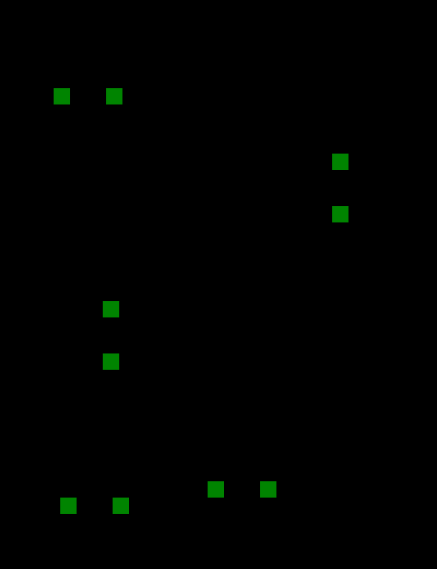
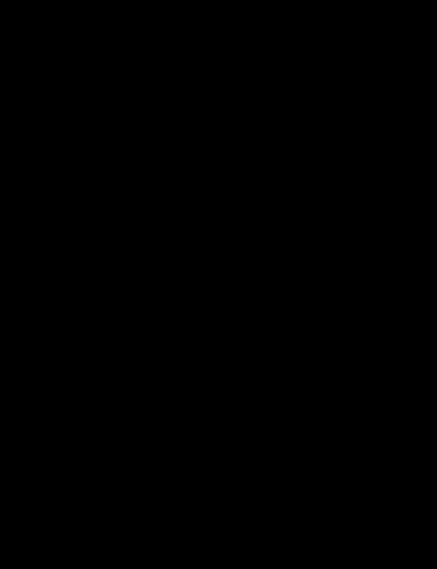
part: (88, 96) -> none
part: (340, 188) -> none
part: (110, 335) -> none
part: (242, 489) -> none
part: (94, 505) -> none

